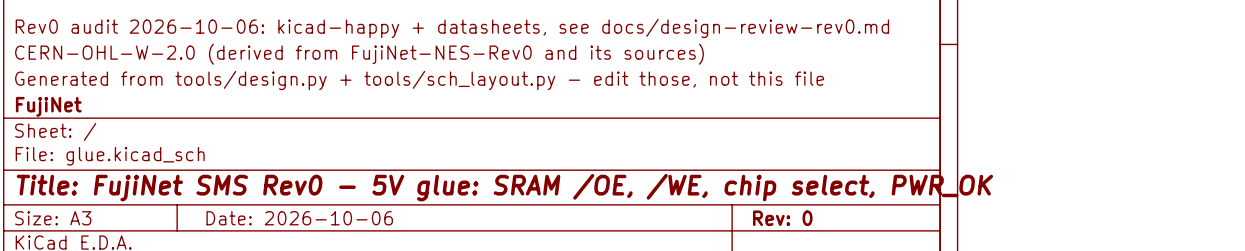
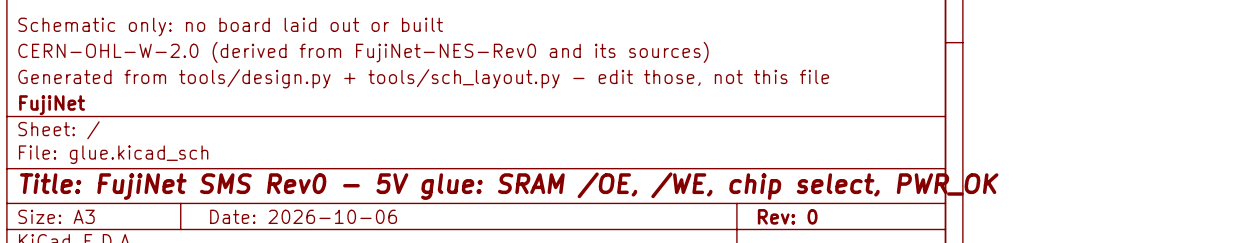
title block: Rev0 audit 2026-10-06: kicad-happy + datasheets, see docs/design-review-rev0.md (452, 28) -> Schematic only: no board laid out or built (230, 26)

